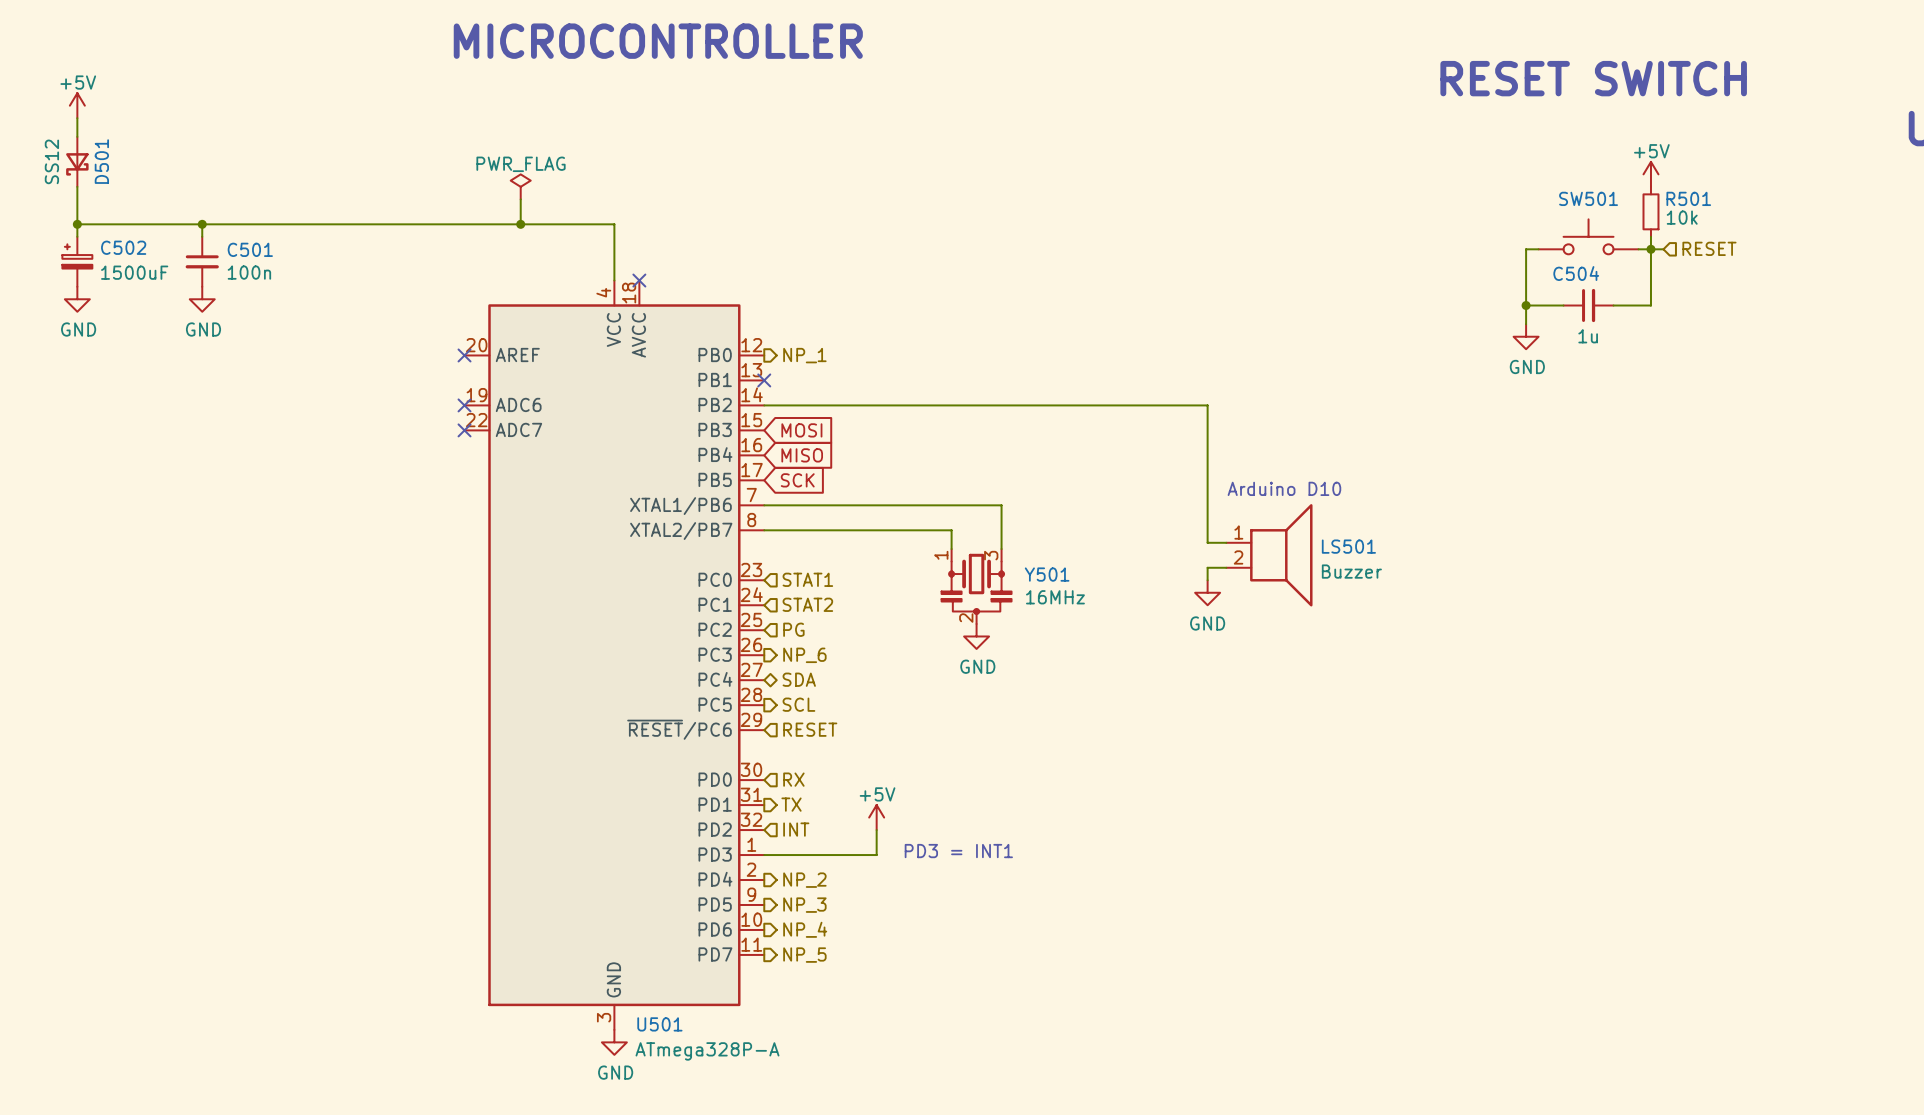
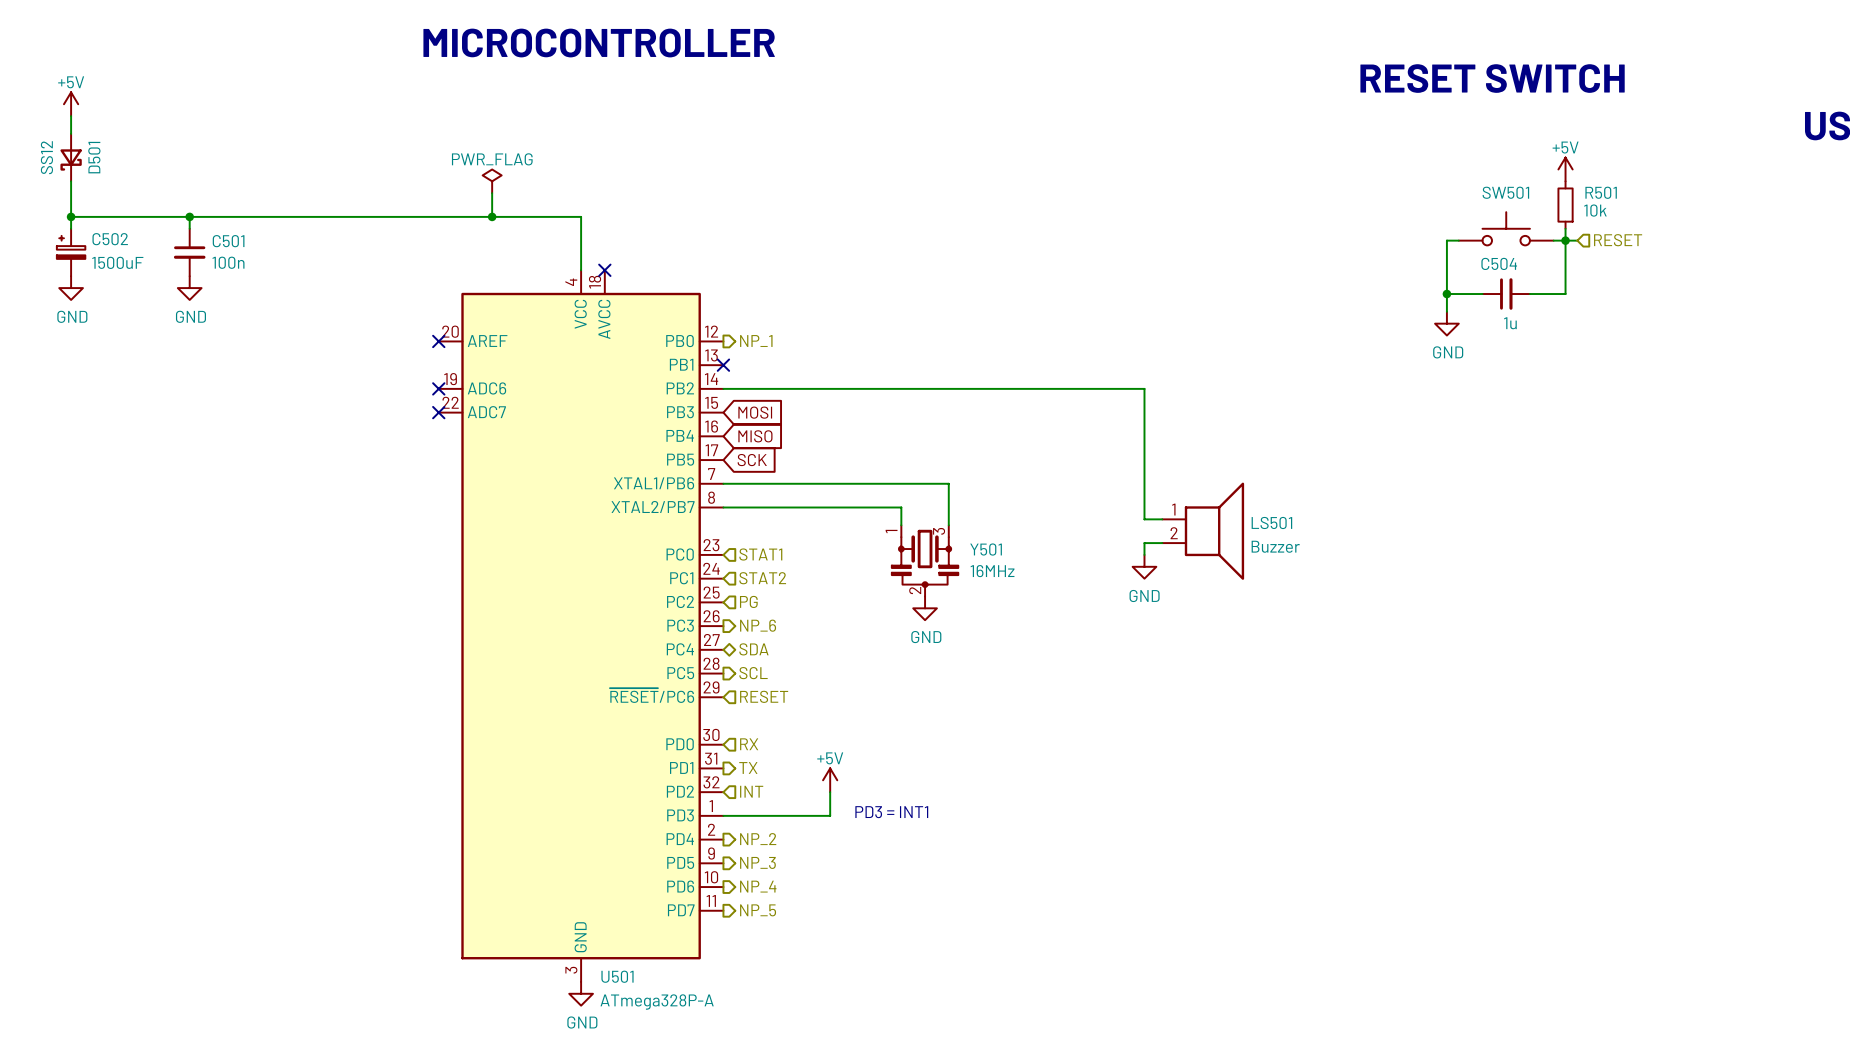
text: Arduino D10 (1284, 488) -> none

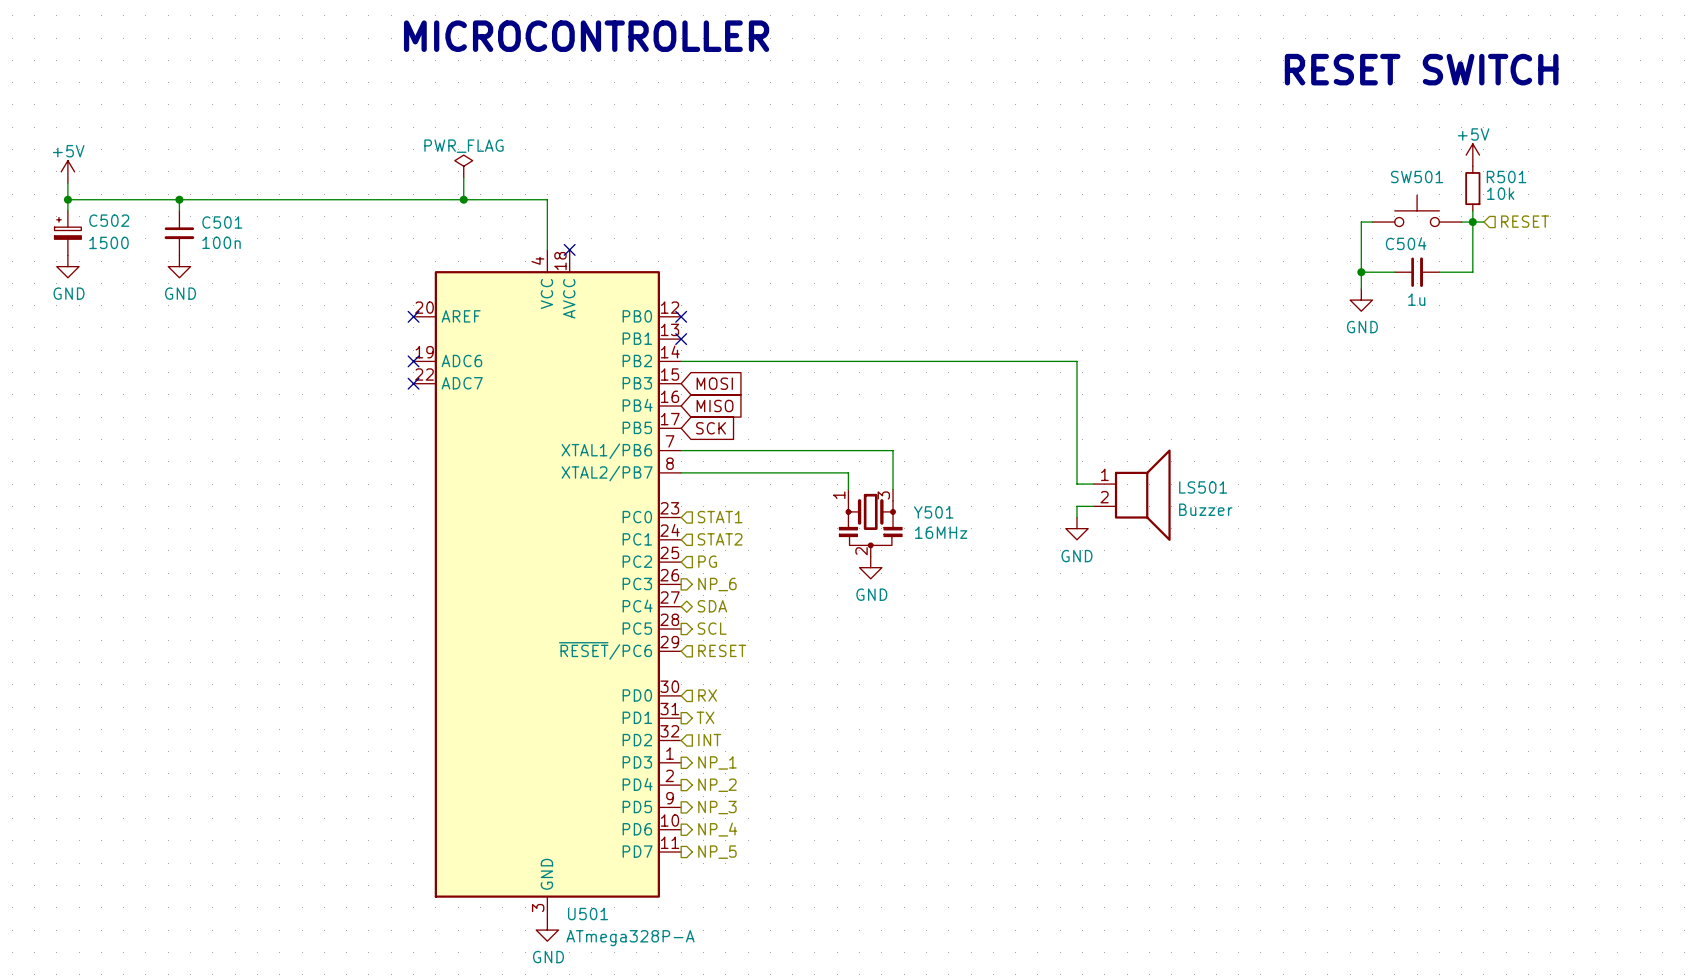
power symbol position: +5V (71, 104) -> +5V (67, 171)
wire: (71, 116) (71, 133) -> none
D501: SS12 (71, 157) -> none
C502 value: 1500uF (117, 262) -> 1500 (108, 242)
no-connect mark: none -> (681, 316)
hierarchical label: NP_1 (756, 341) -> none
power symbol: +5V (830, 780) -> none
wire: (830, 792) (830, 815) (723, 815) -> none
text: PD3 = INT1 (891, 812) -> none
hierarchical label: none -> NP_1 (717, 762)

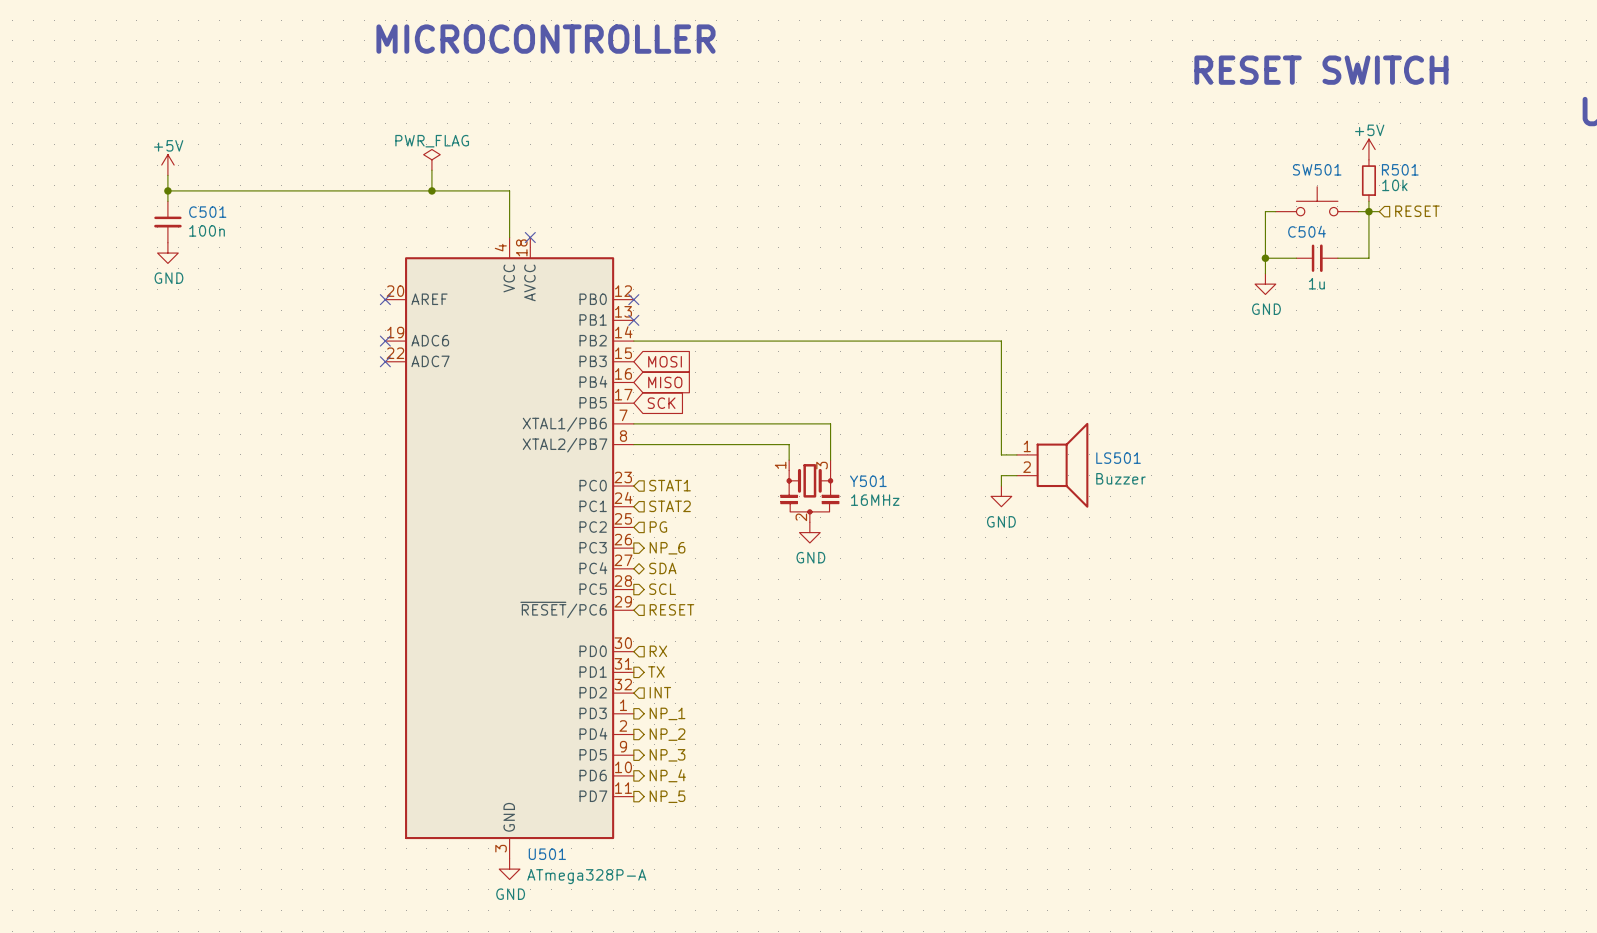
power symbol position: +5V (67, 171) -> +5V (167, 165)
wire: (67, 183) (67, 210) -> none
wire: (67, 199) (179, 199) -> (167, 175) (167, 190)
junction: (67, 199) -> none
C502: 1500 (67, 233) -> none
power symbol: GND (67, 266) -> none

